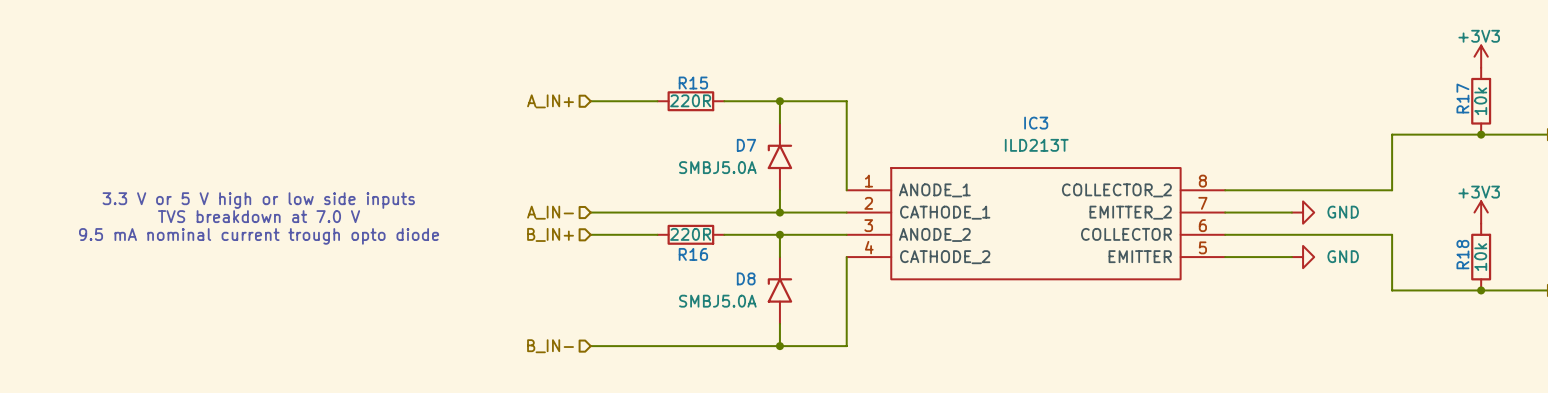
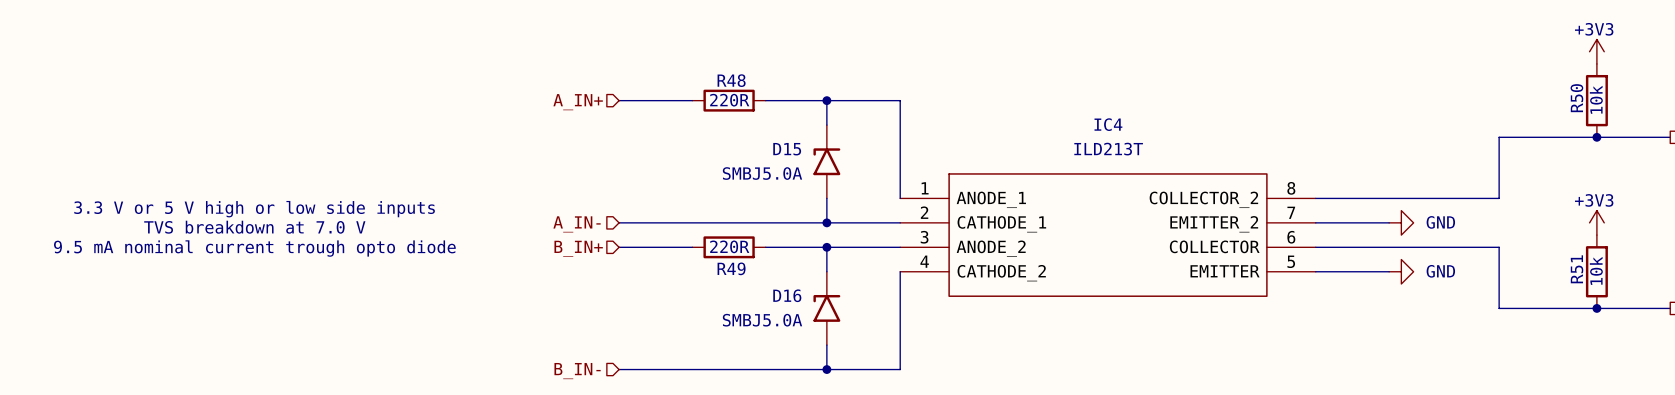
R15 name: R15 (693, 83) -> R48 (731, 80)
R17 name: R17 (1462, 98) -> R50 (1576, 98)
IC3 name: IC3 (1036, 123) -> IC4 (1108, 124)
D7 name: D7 (746, 145) -> D15 (787, 149)
R16 name: R16 (693, 254) -> R49 (731, 268)
R18 name: R18 (1462, 254) -> R51 (1577, 269)
D8 name: D8 (746, 278) -> D16 (787, 295)

